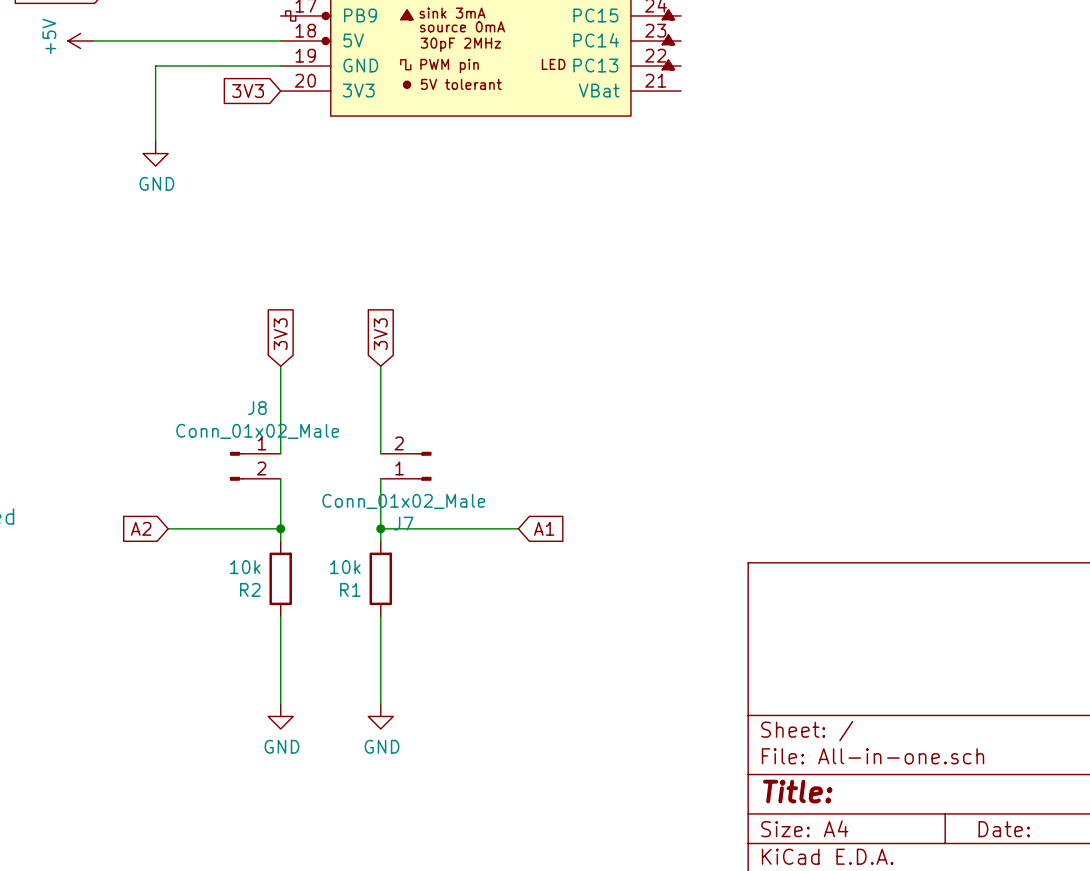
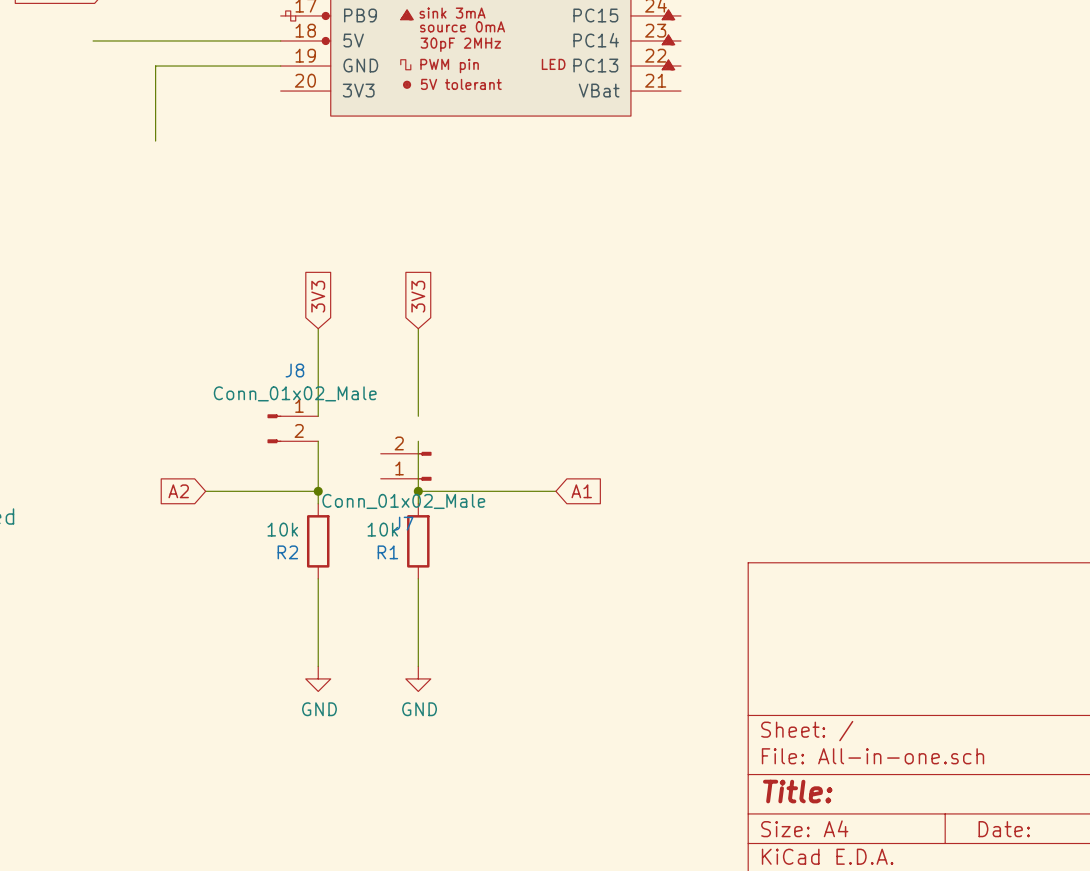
power symbol: +5V (80, 40) -> none
global label: 3V3 (248, 91) -> none
power symbol: GND (155, 153) -> none
global label: none -> 3V3 (318, 296)
global label: none -> 3V3 (418, 296)
global label: 3V3 (280, 334) -> none
global label: 3V3 (380, 334) -> none
wire: (280, 366) (280, 453) -> (318, 328) (318, 416)
wire: (380, 366) (380, 453) -> (418, 328) (418, 416)
J8 position: (255, 466) -> (292, 428)
wire: (280, 478) (280, 541) -> (318, 441) (318, 503)
wire: (380, 478) (380, 541) -> (418, 441) (418, 503)
junction: none -> (318, 491)
junction: none -> (418, 491)
global label position: A2 (141, 528) -> A2 (178, 491)
wire: (168, 528) (280, 528) -> (205, 491) (318, 491)
junction: (280, 528) -> none
wire: (380, 528) (518, 528) -> (418, 491) (555, 491)
junction: (380, 528) -> none
global label position: A1 (544, 528) -> A1 (581, 491)
R2 position: (280, 578) -> (318, 541)
R1 position: (380, 578) -> (418, 541)
wire: (280, 616) (280, 703) -> (318, 578) (318, 666)
wire: (380, 616) (380, 703) -> (418, 578) (418, 666)
power symbol: none -> GND (318, 678)
power symbol: none -> GND (418, 678)
power symbol: GND (280, 716) -> none
power symbol: GND (380, 716) -> none

